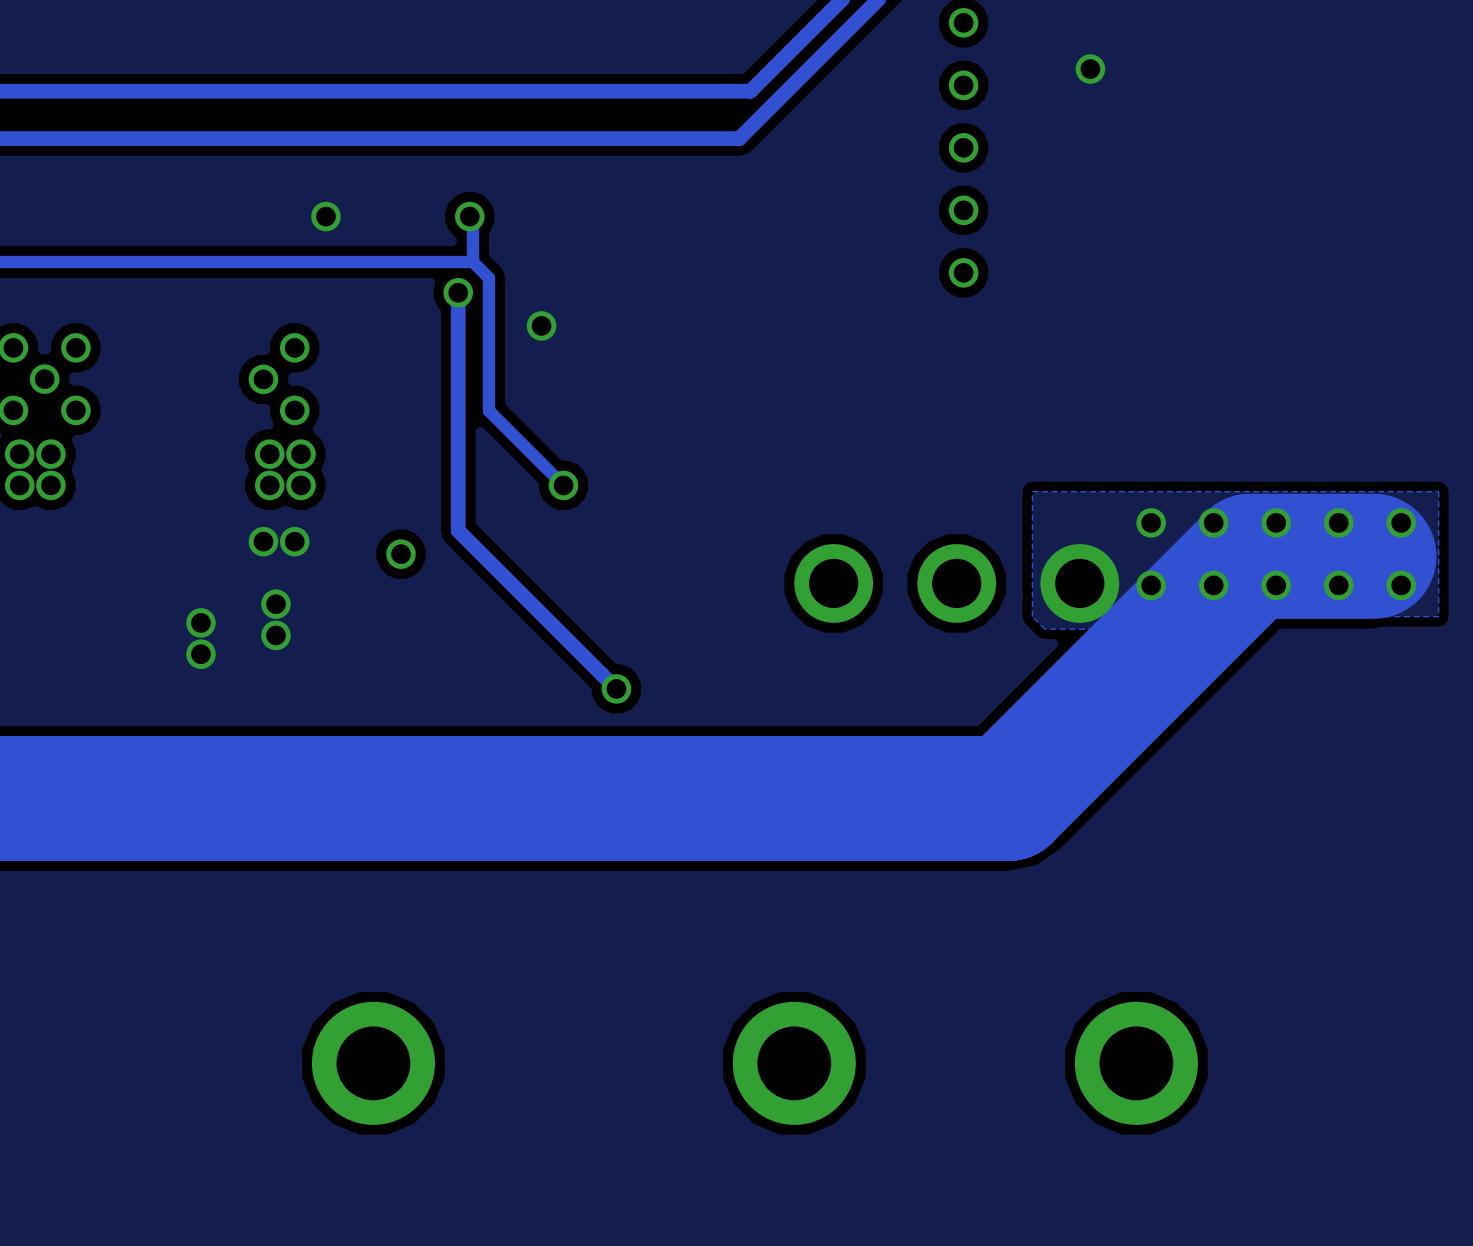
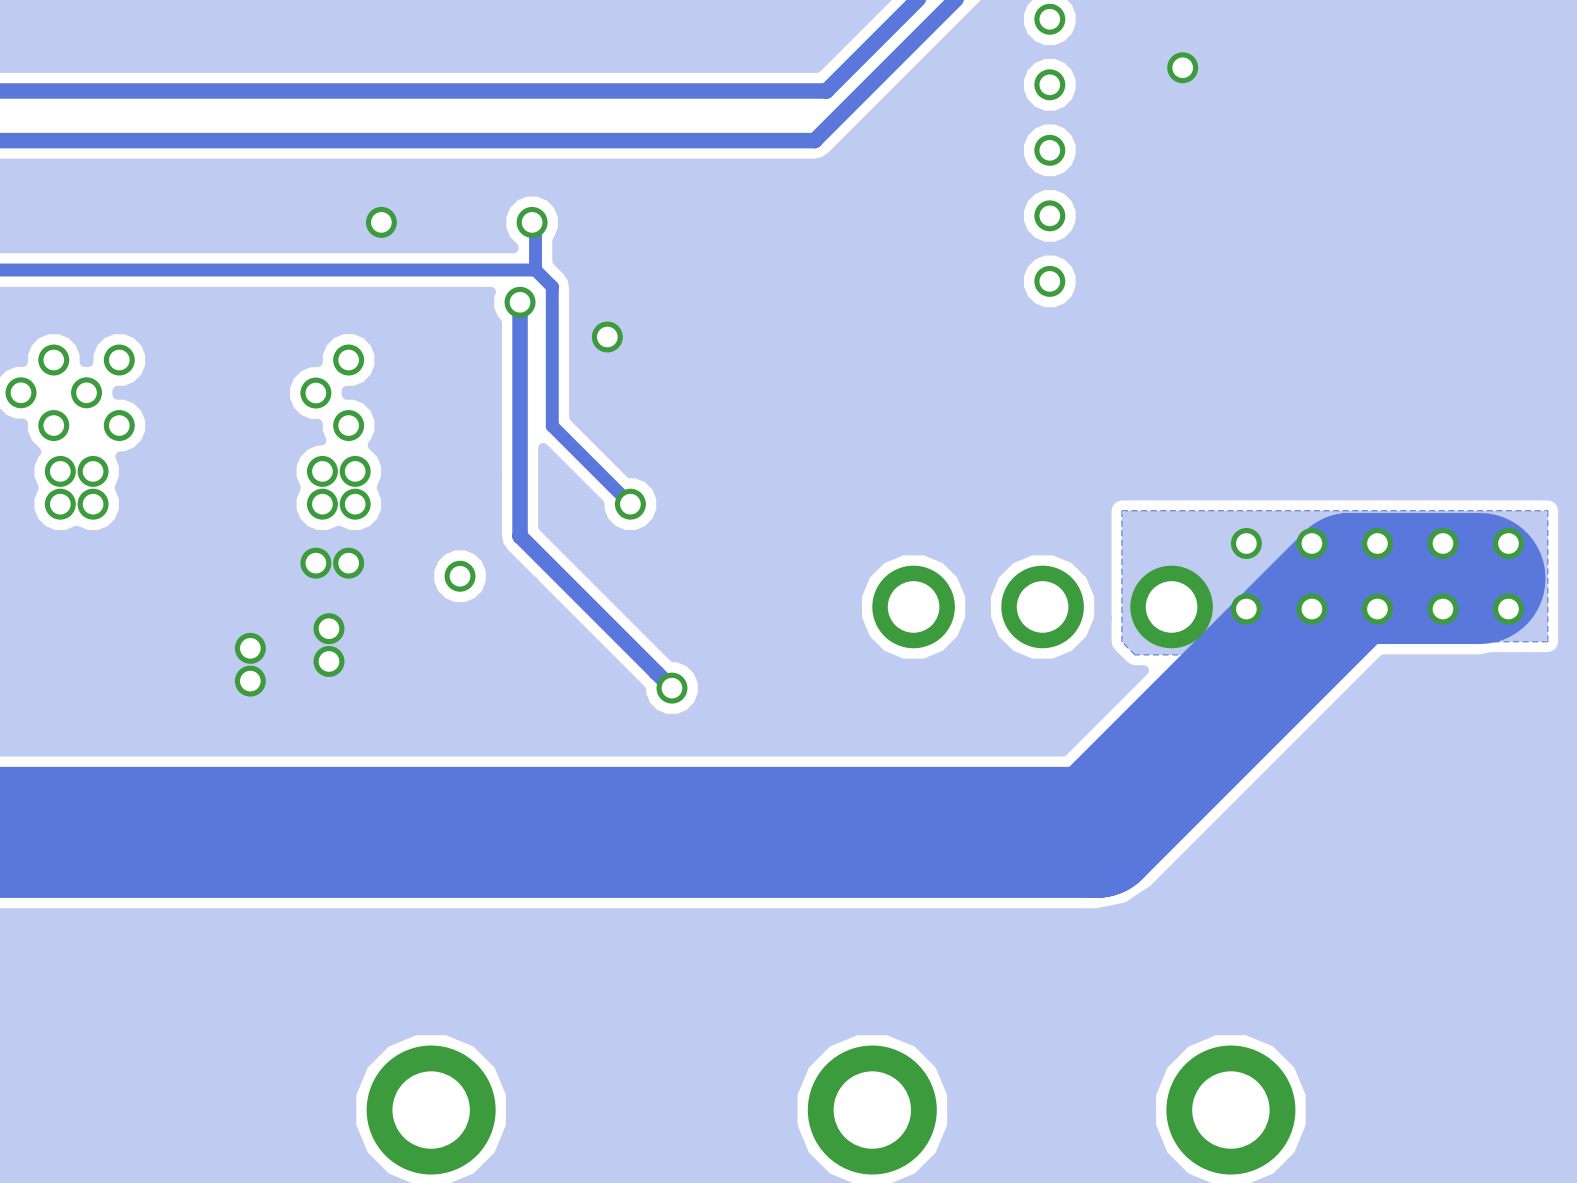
track: (458, 515) (458, 530) (616, 688) -> (520, 536) (671, 688)
via position: (616, 688) -> (671, 688)

